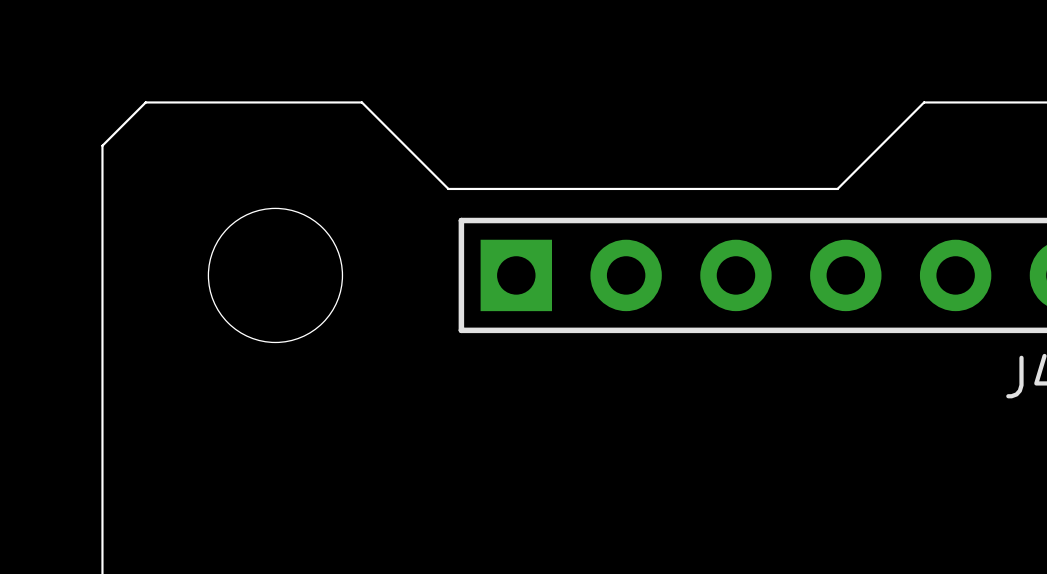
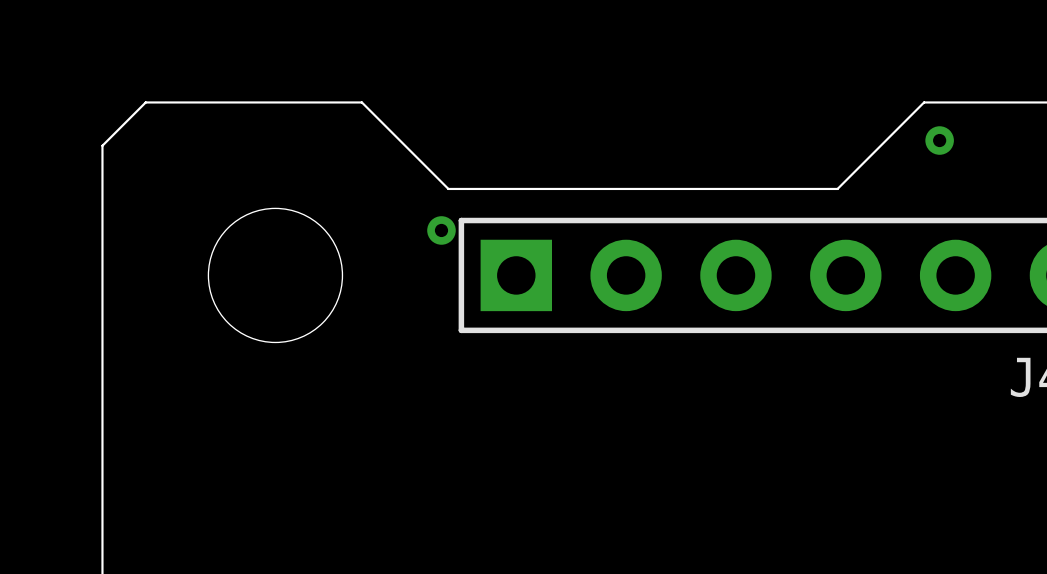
via: none -> (939, 140)
via: none -> (441, 230)

